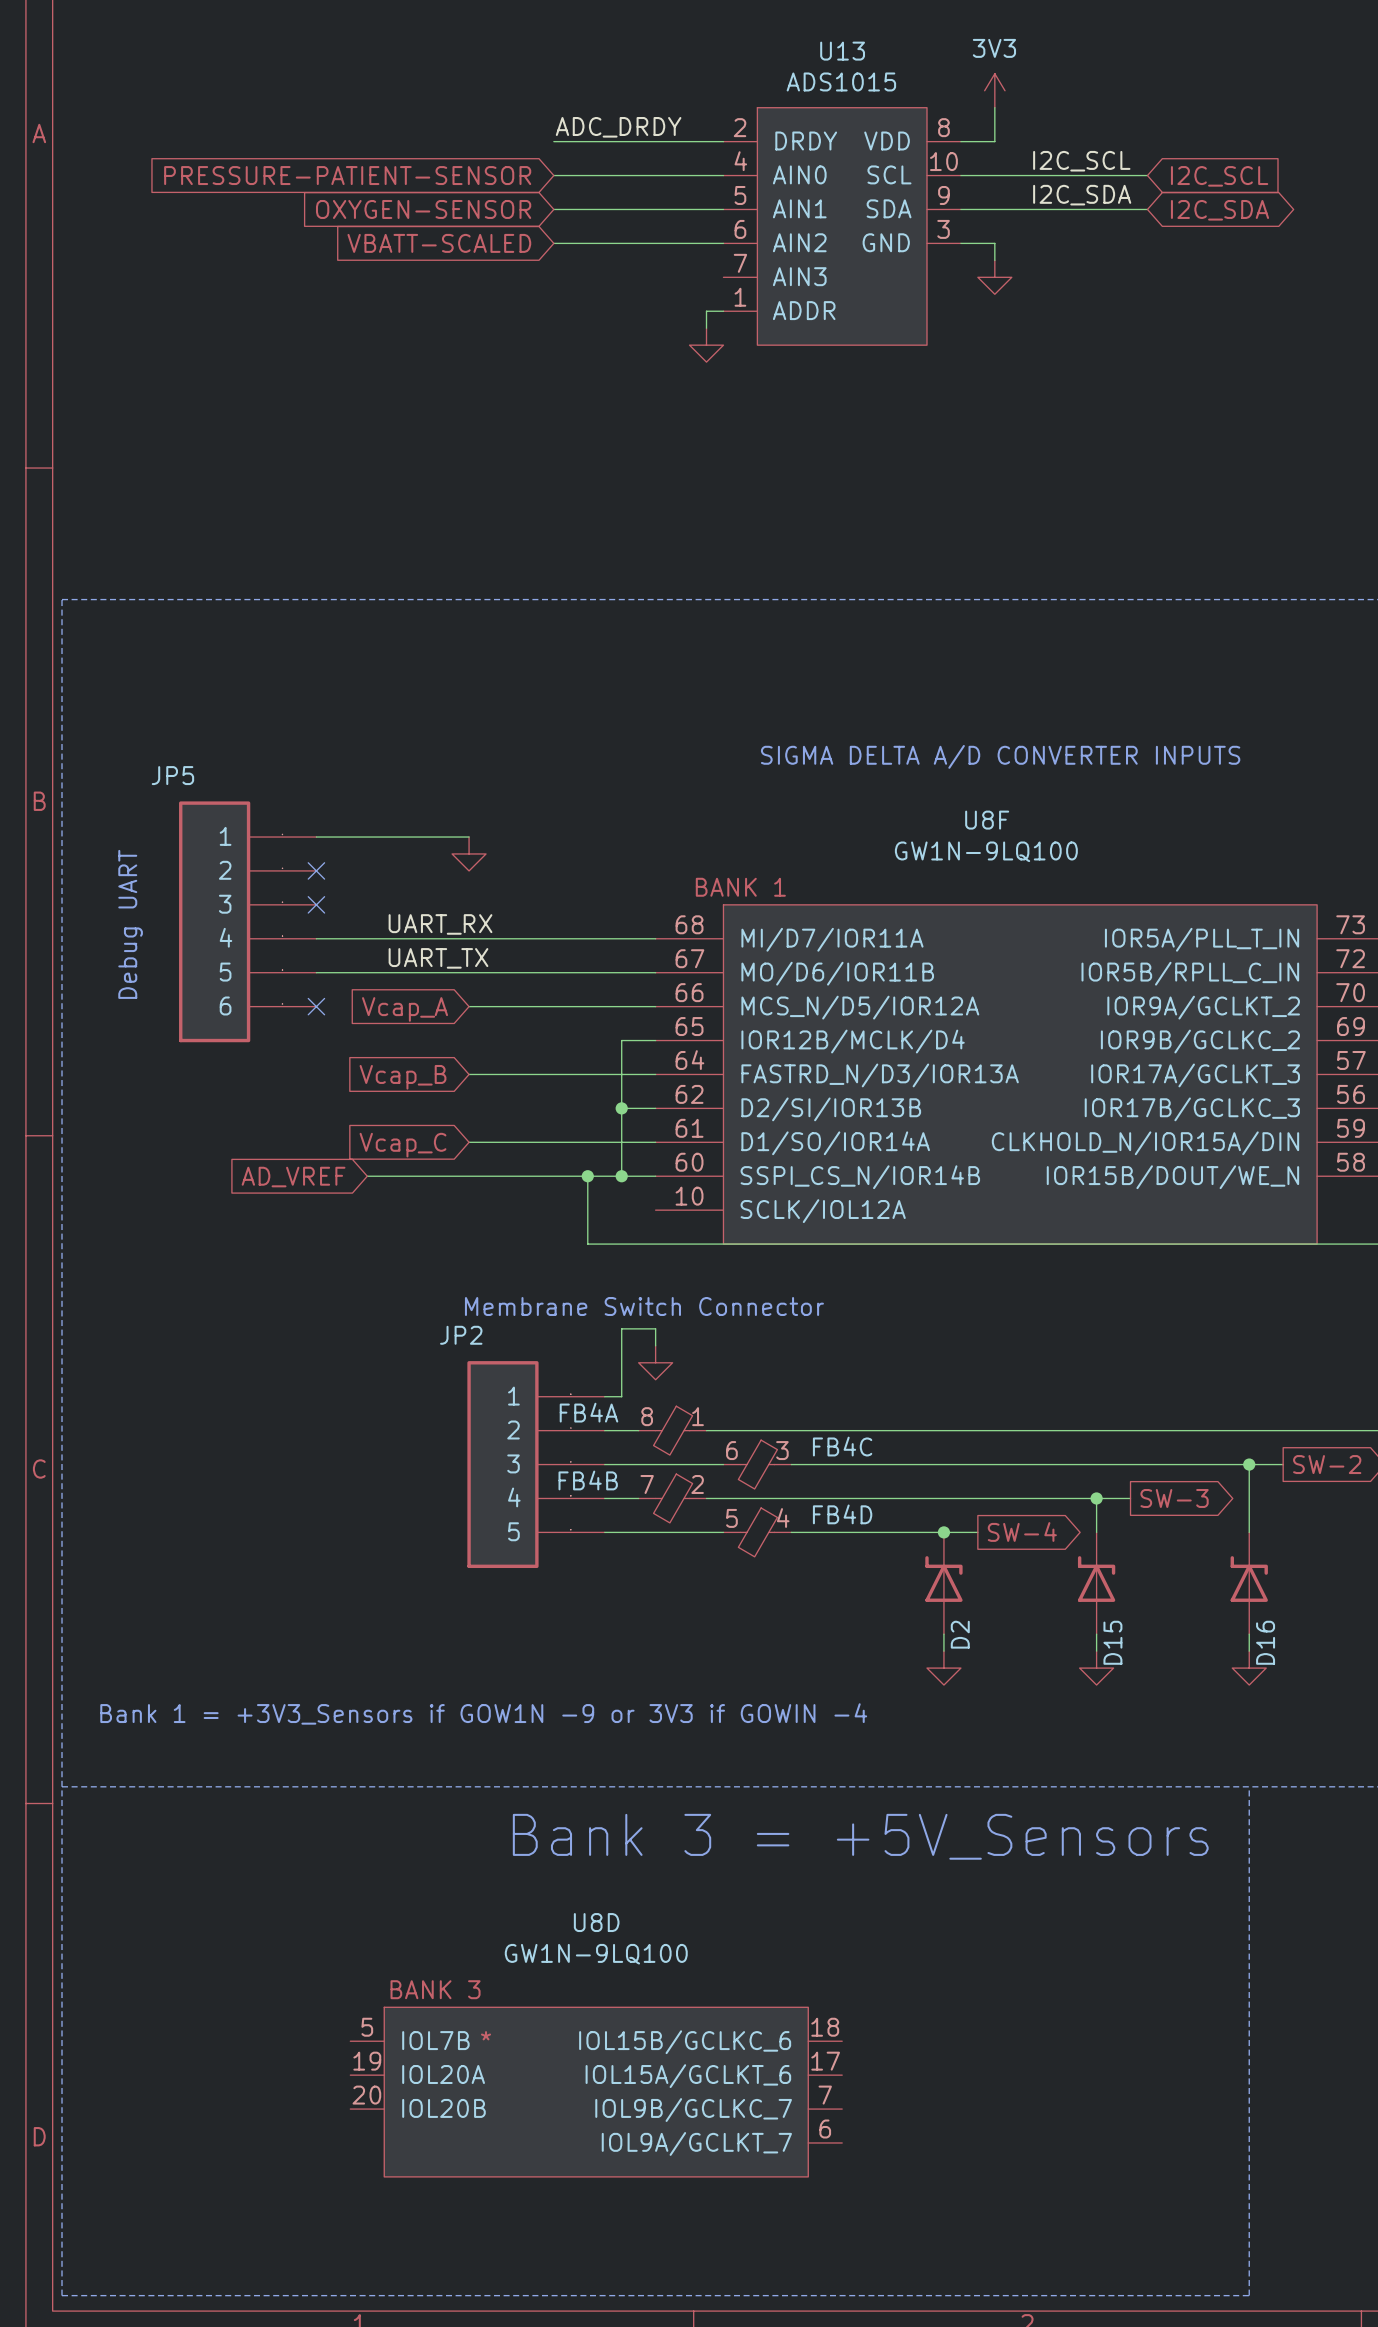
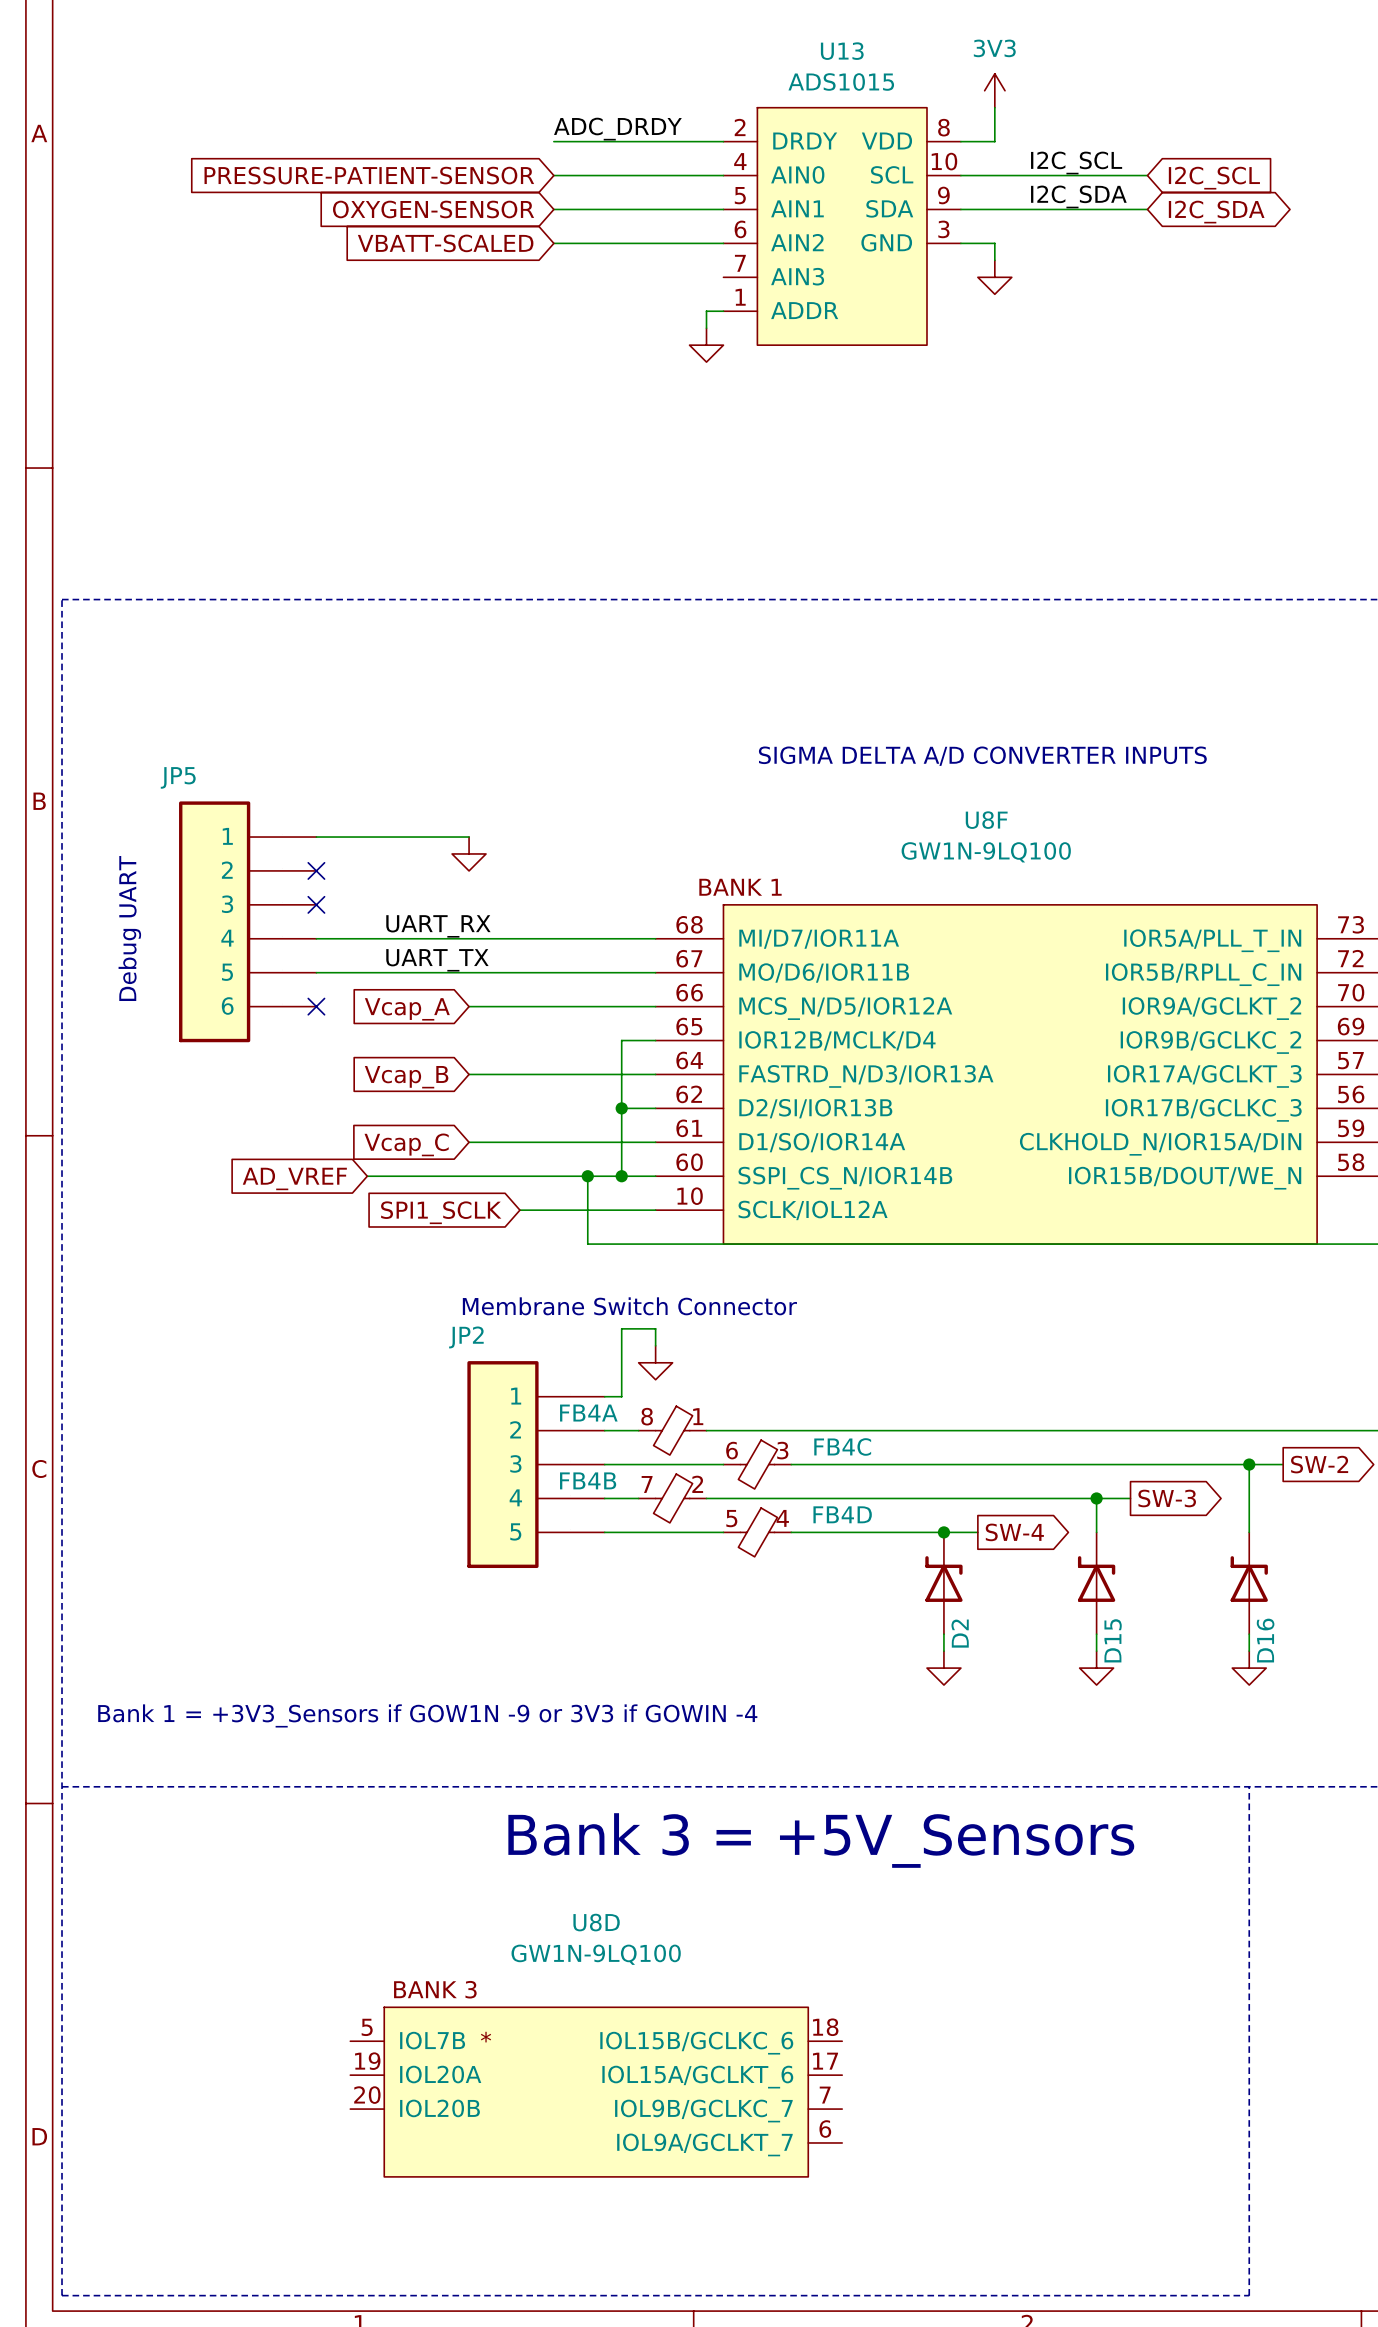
global label: none -> SPI1_SCLK (441, 1212)
wire: none -> (519, 1210) (655, 1210)

